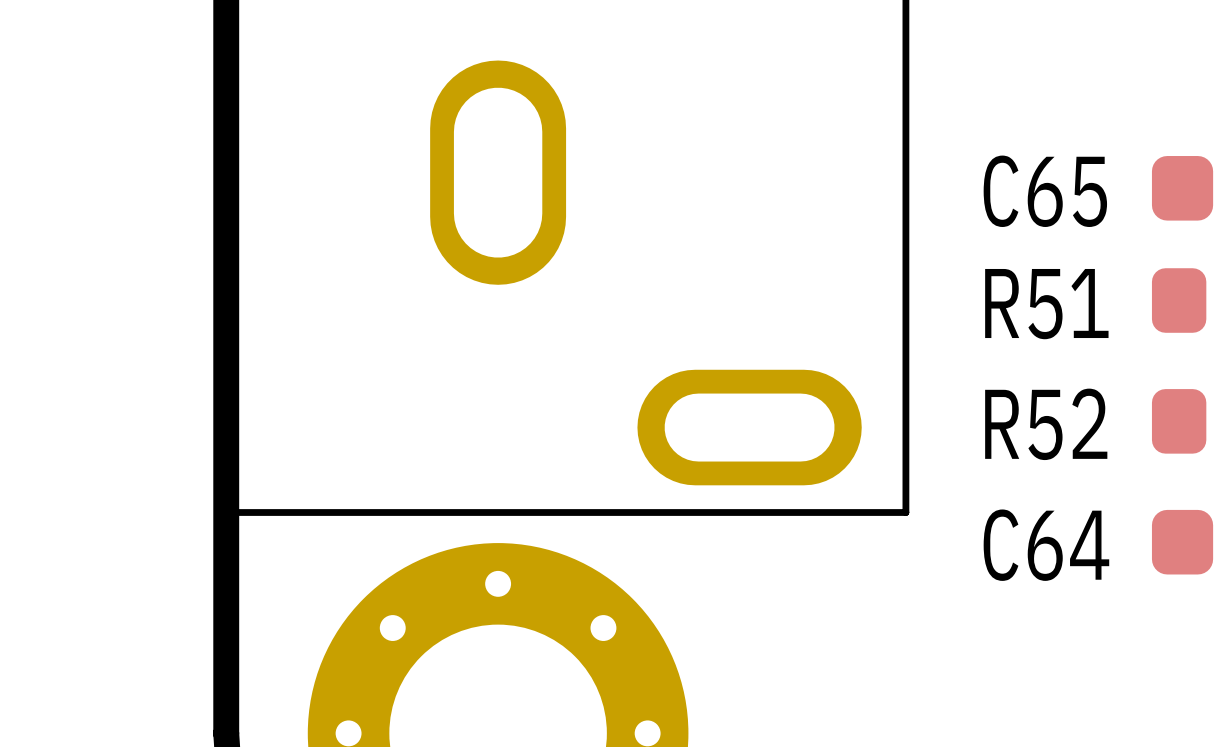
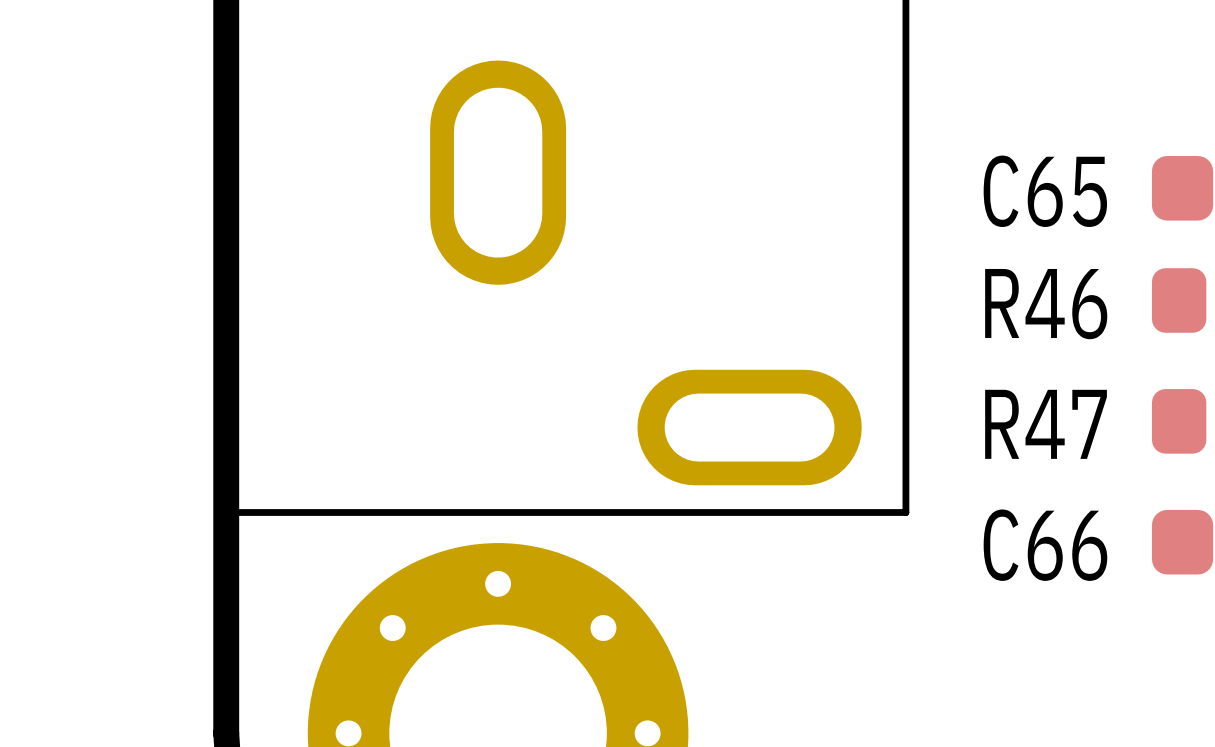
R51 name: R51 (1046, 304) -> R46 (1046, 304)
R52 name: R52 (1046, 424) -> R47 (1046, 424)
C64 name: C64 (1046, 545) -> C66 (1045, 545)

